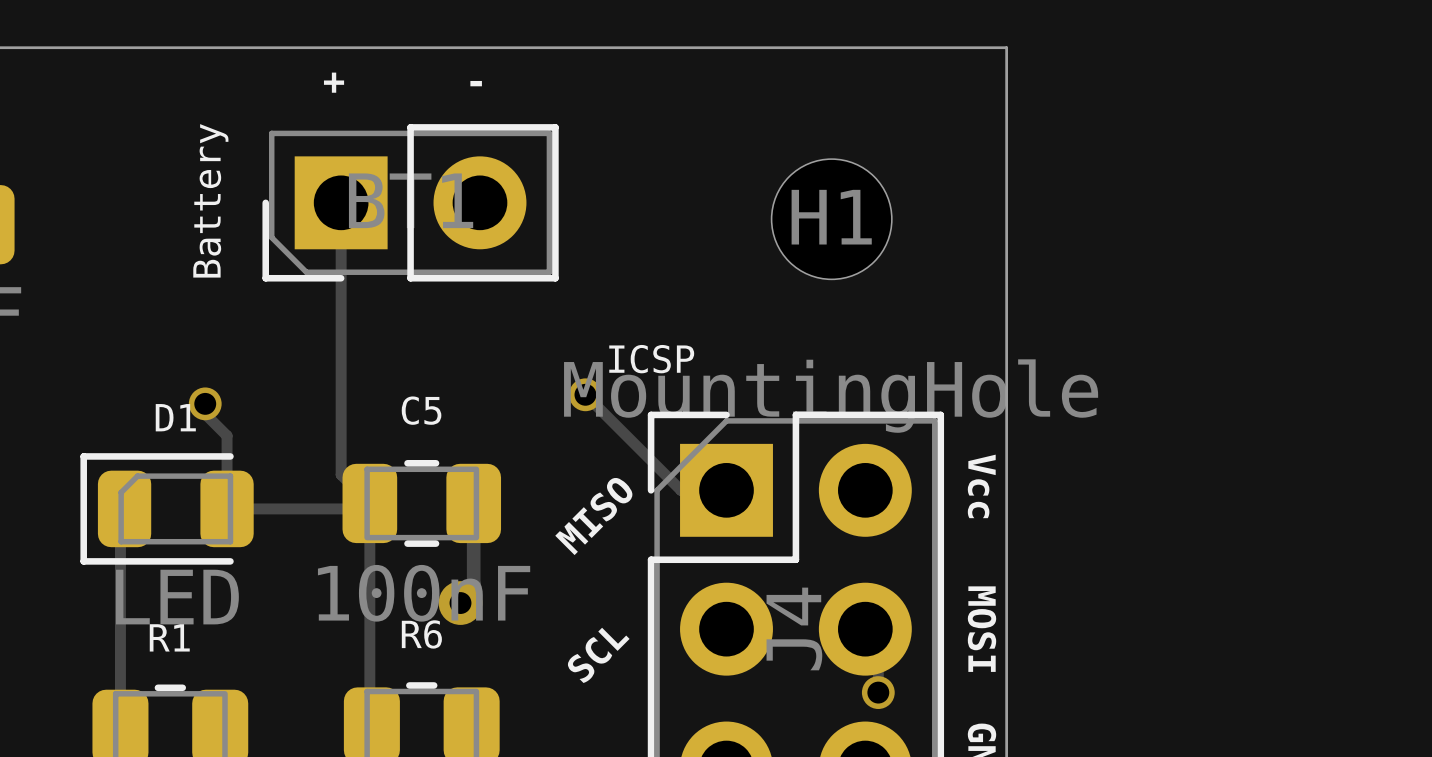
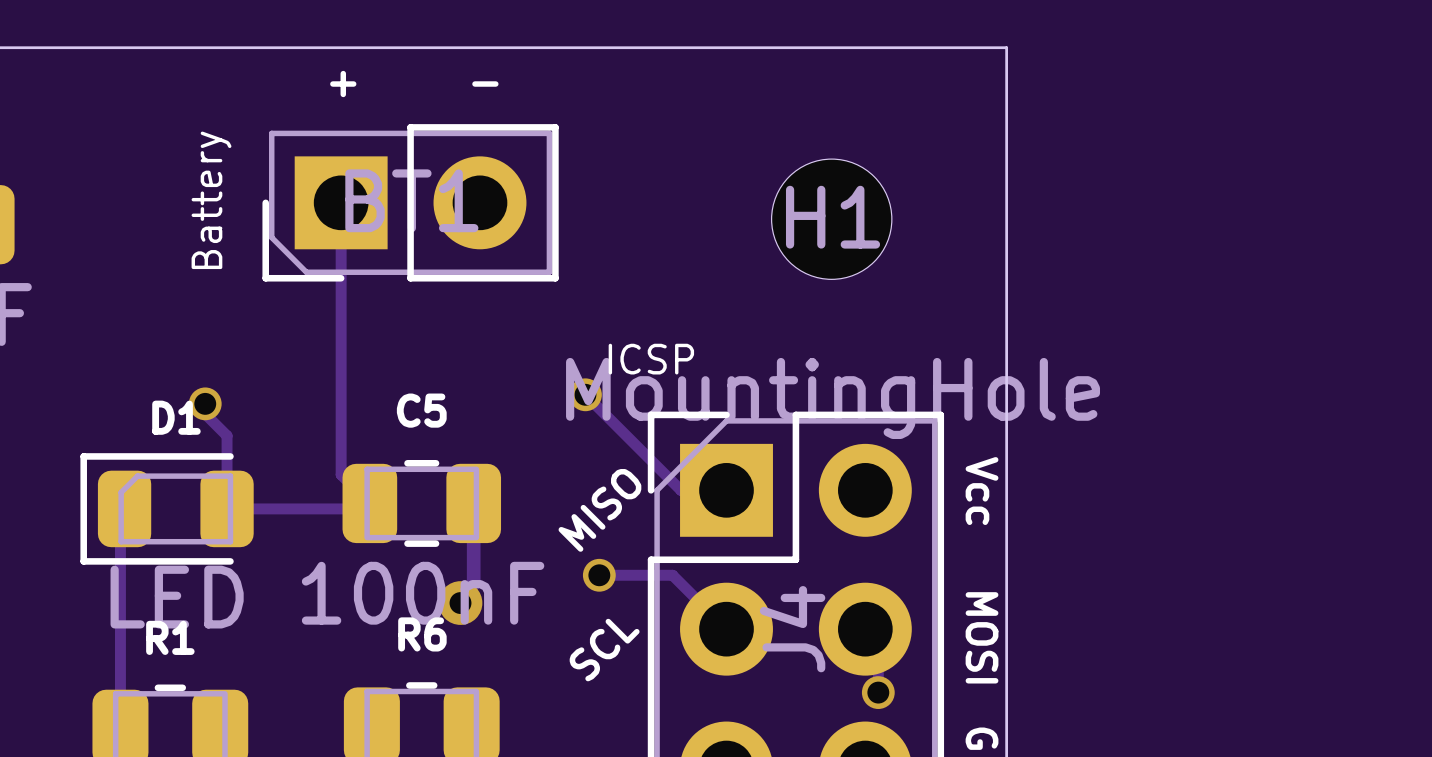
track: (369, 503) (369, 723) (371, 725) -> none
track: none -> (599, 575) (672, 575) (726, 629)
via: none -> (599, 575)

